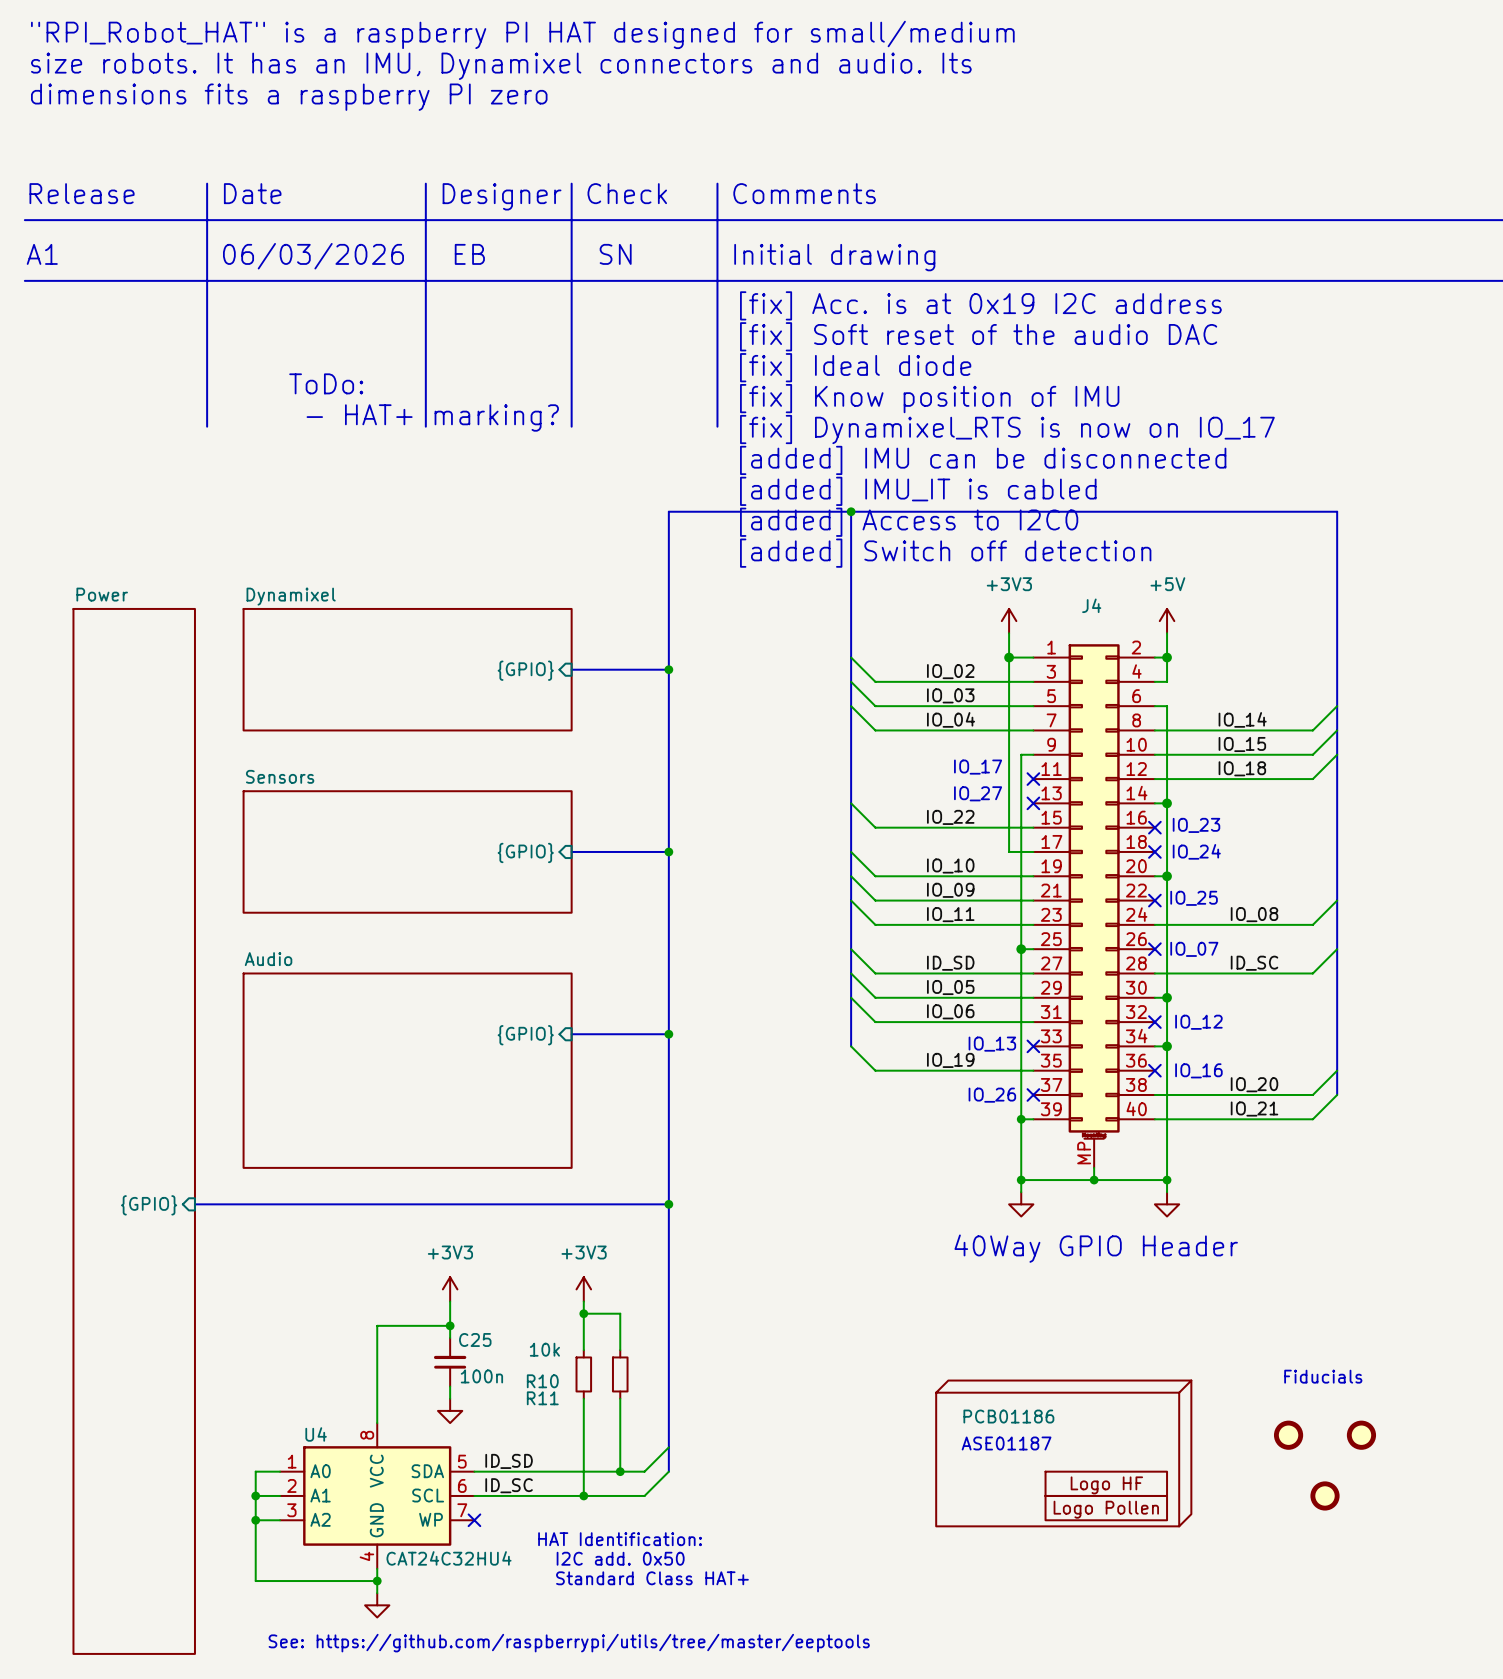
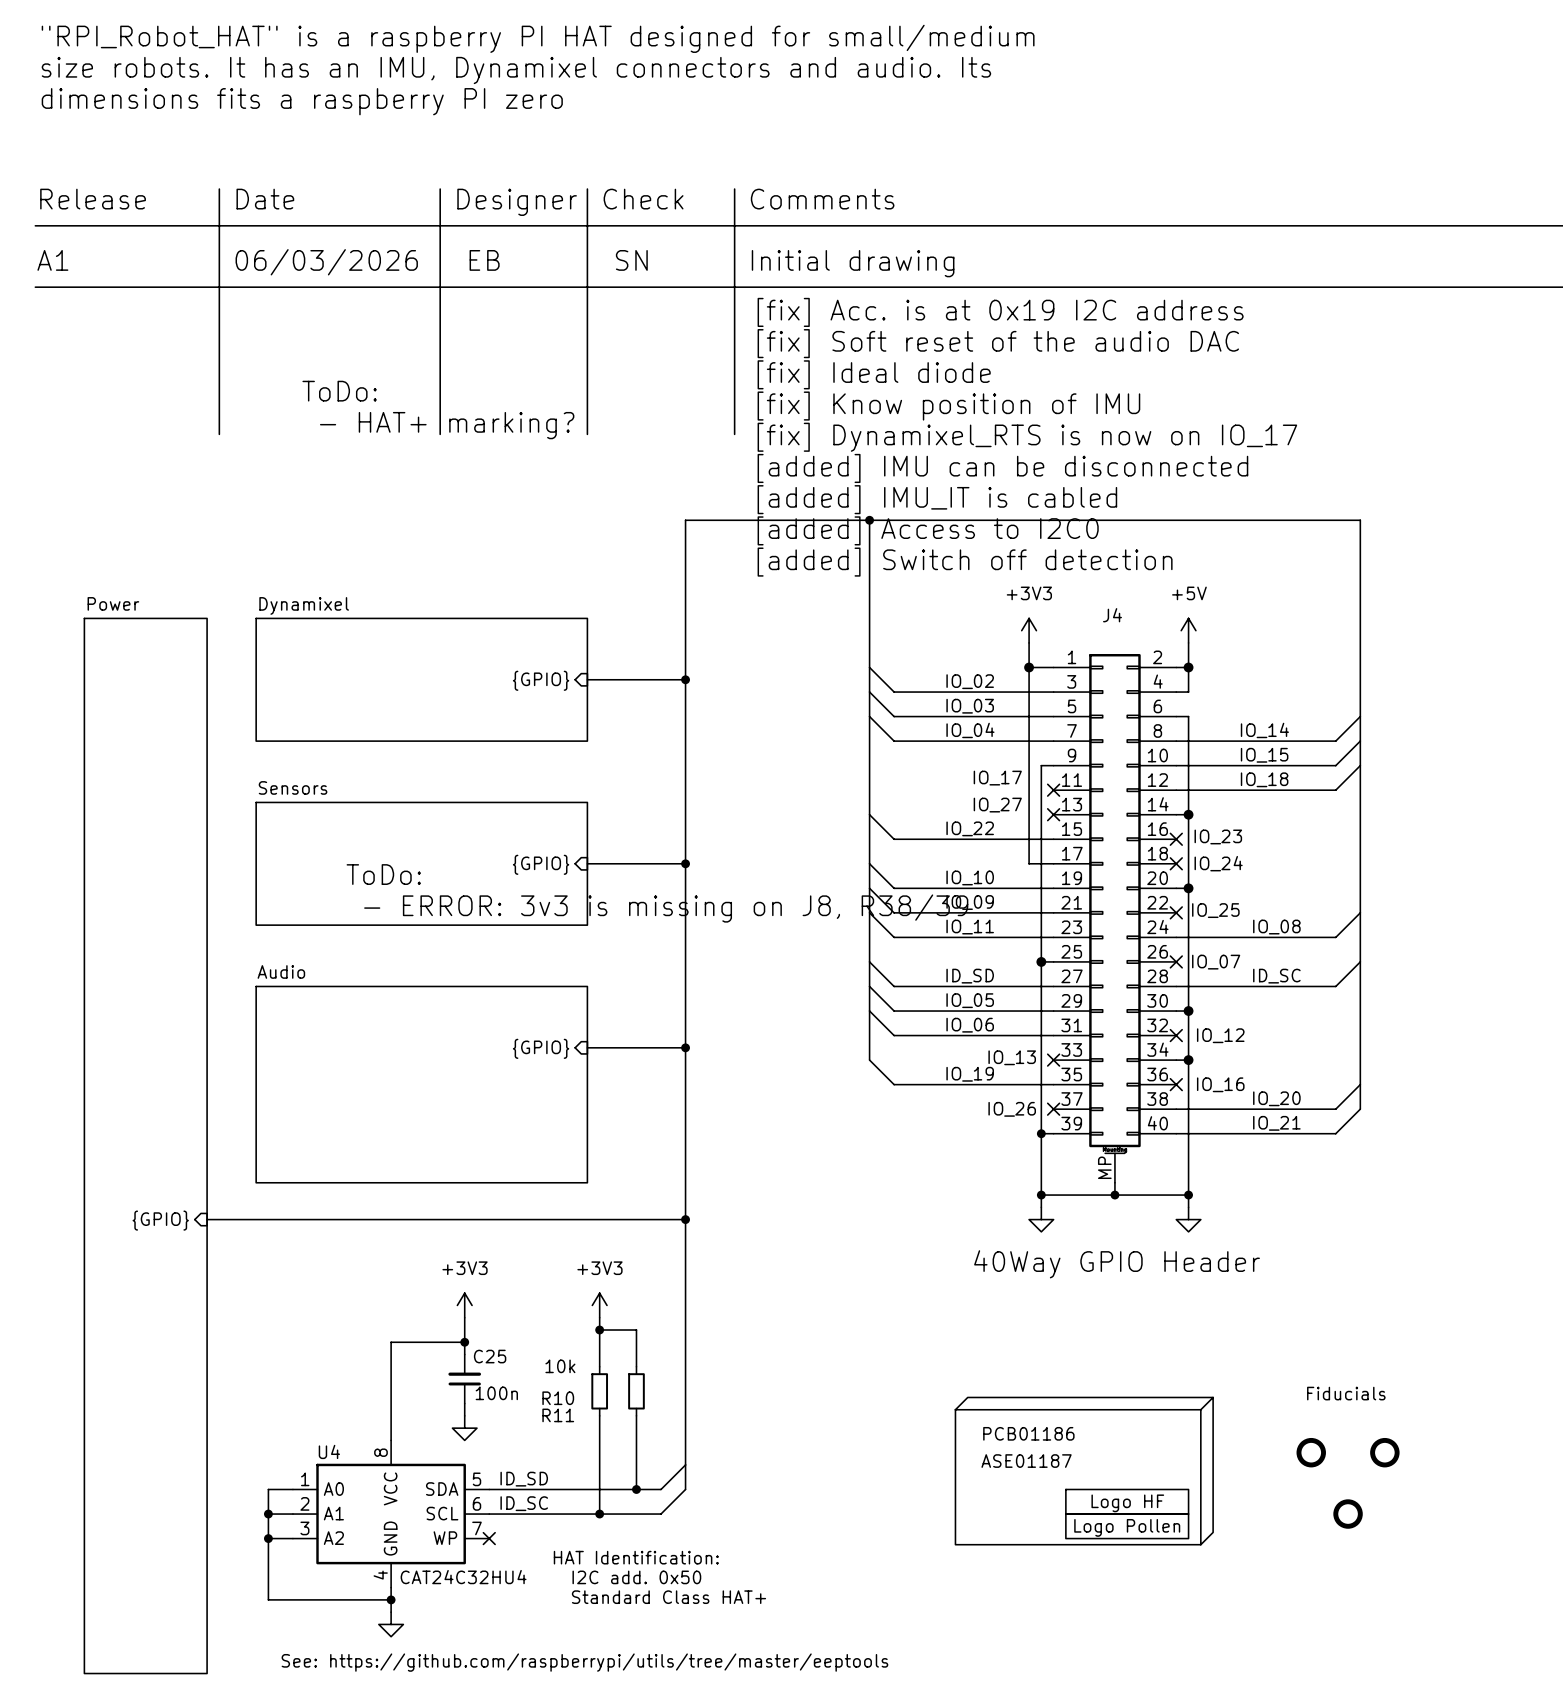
text: none -> ToDo: (383, 874)
text: none -> - ERROR: 3v3 is missing on J8, R38/39 (666, 908)

